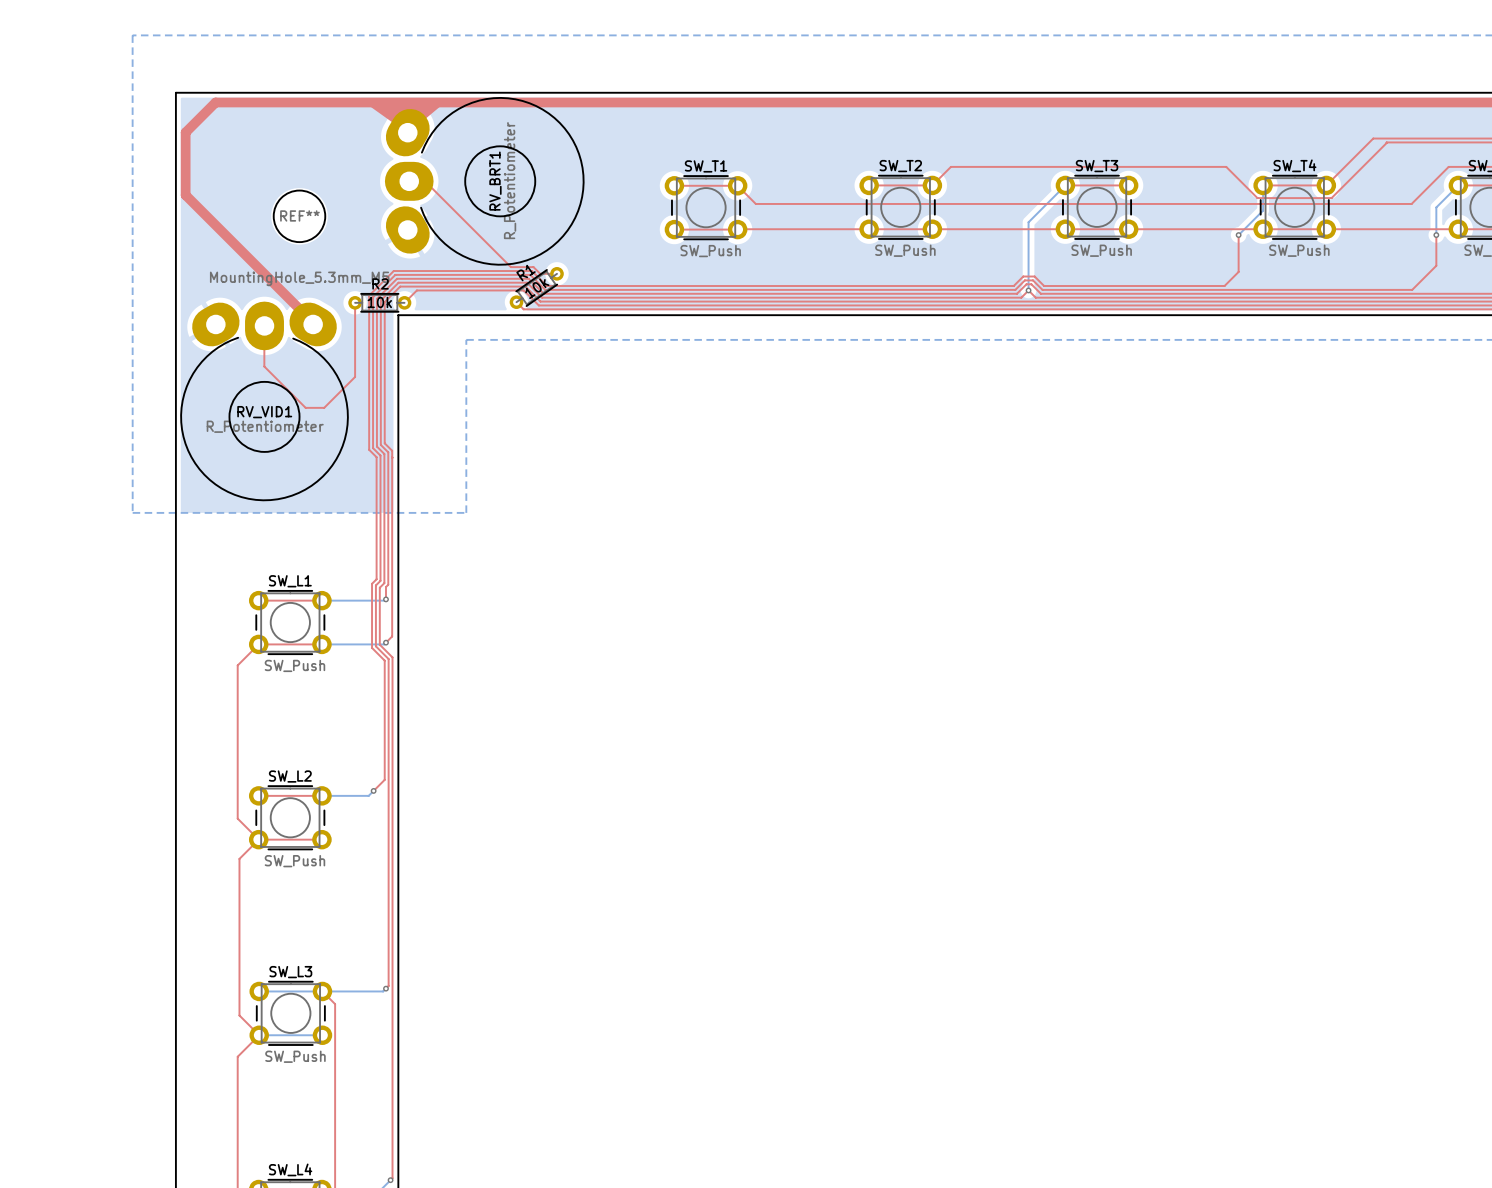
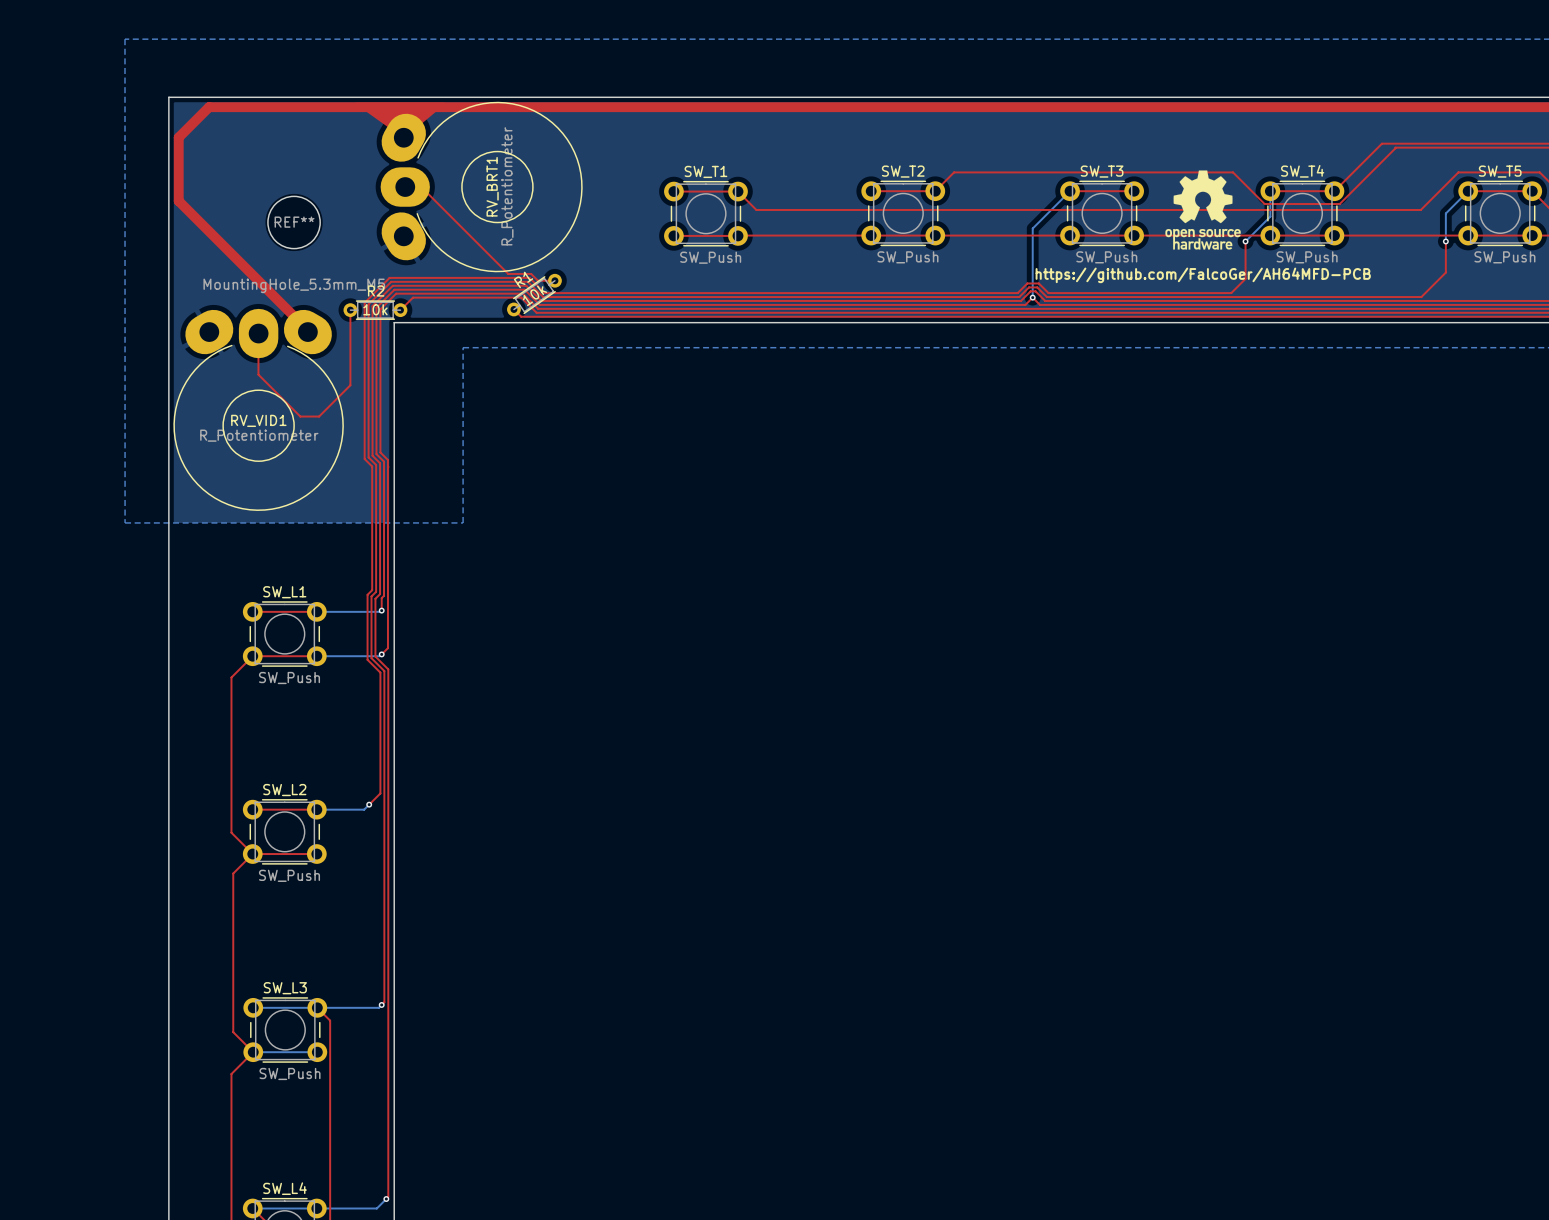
drawing: none -> [1165, 170, 1241, 250]
text: none -> https://github.com/FalcoGer/AH64MFD-PCB (1203, 275)

